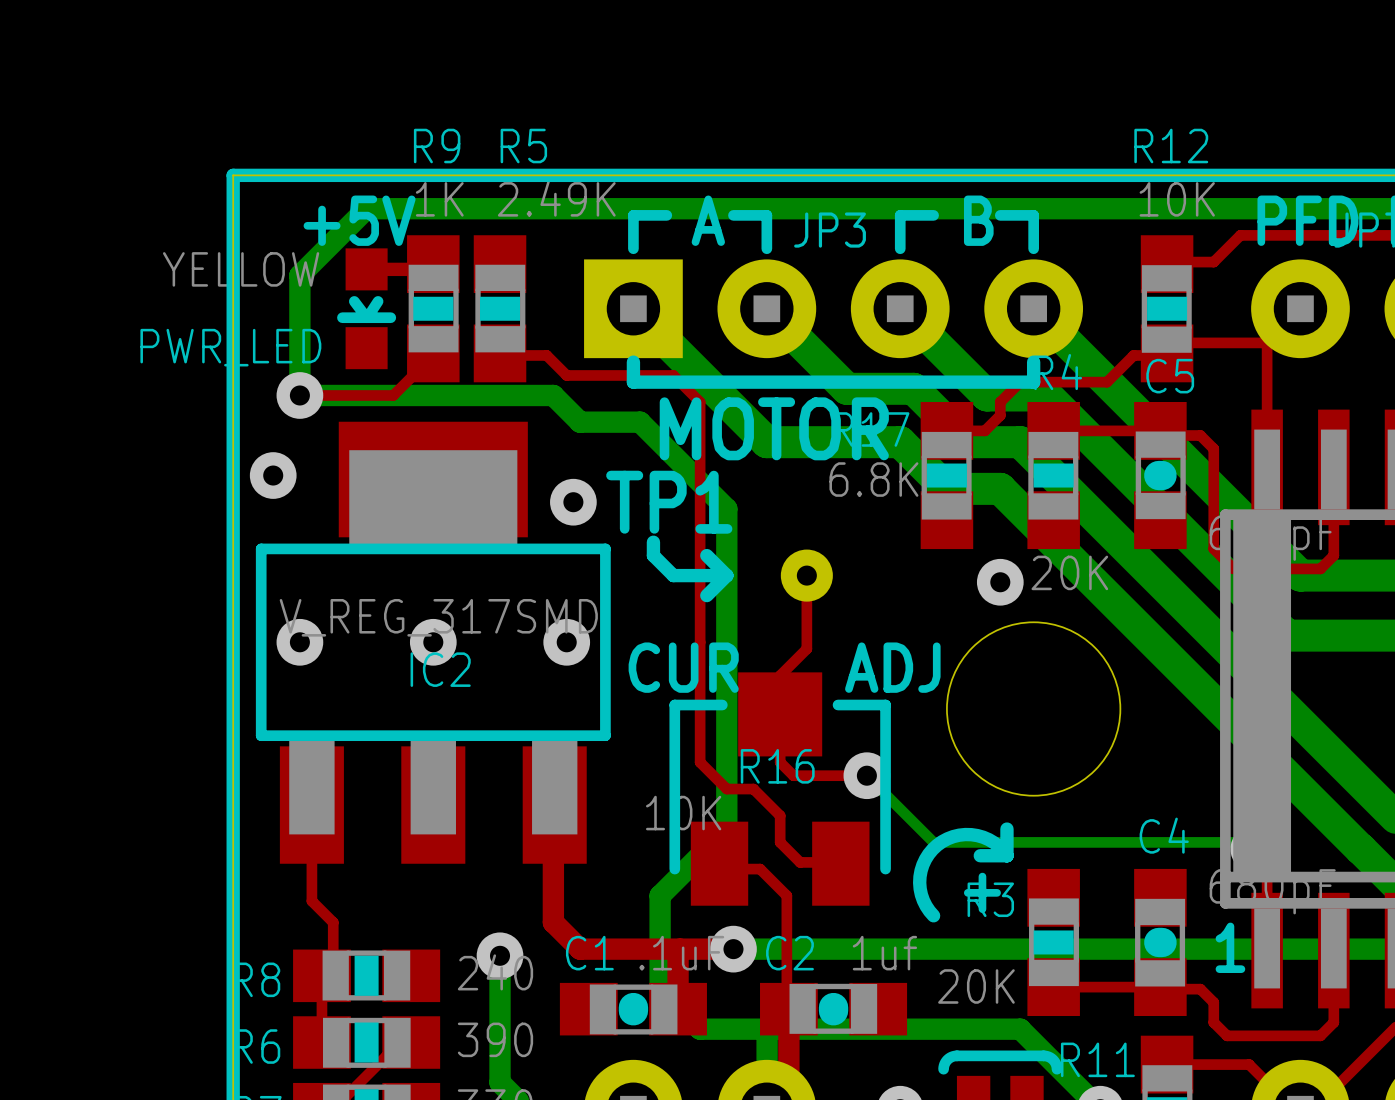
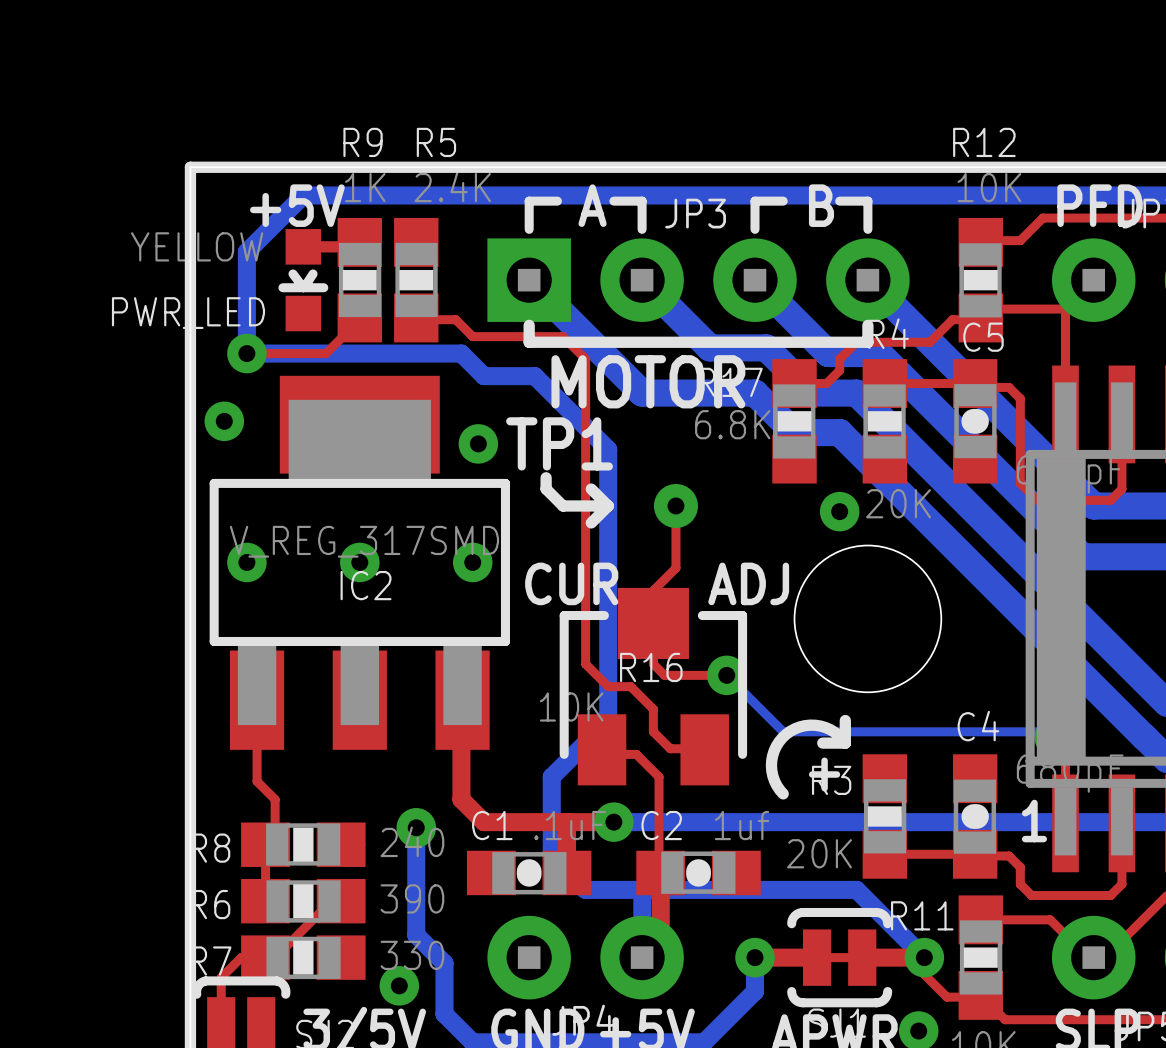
R5 value: 2.49K (556, 198) -> 2.4K (452, 186)

